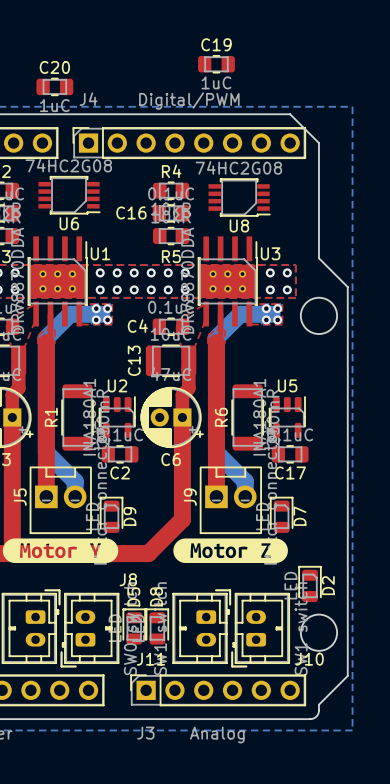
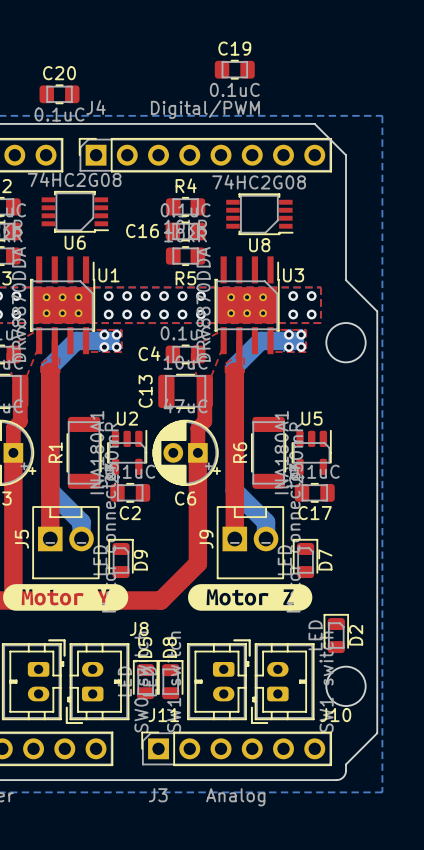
C19 value: 1uC (216, 82) -> 0.1uC (234, 89)
C20 value: 1uC (54, 105) -> 0.1uC (59, 114)

